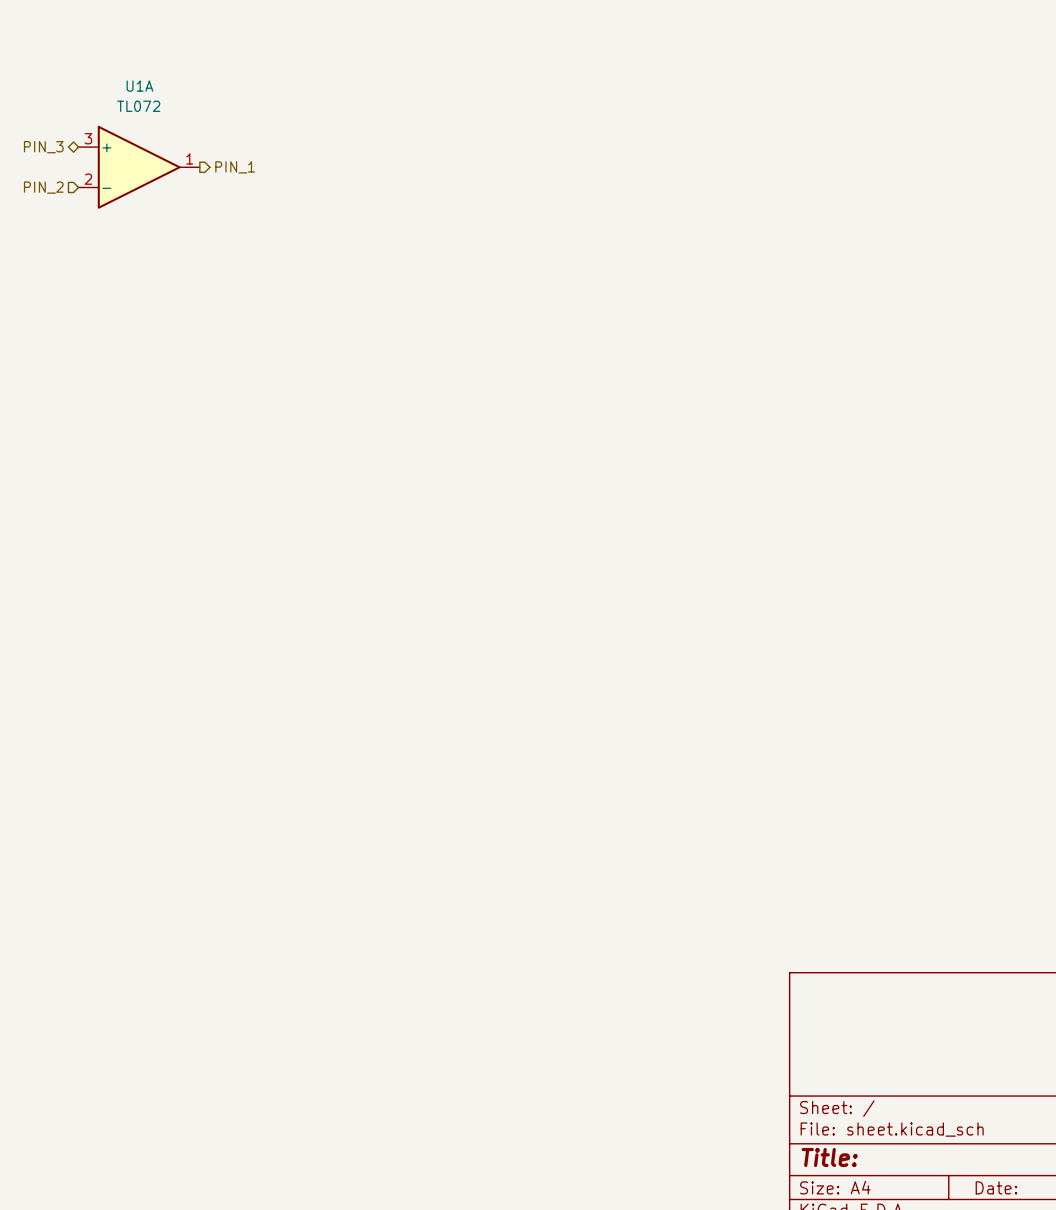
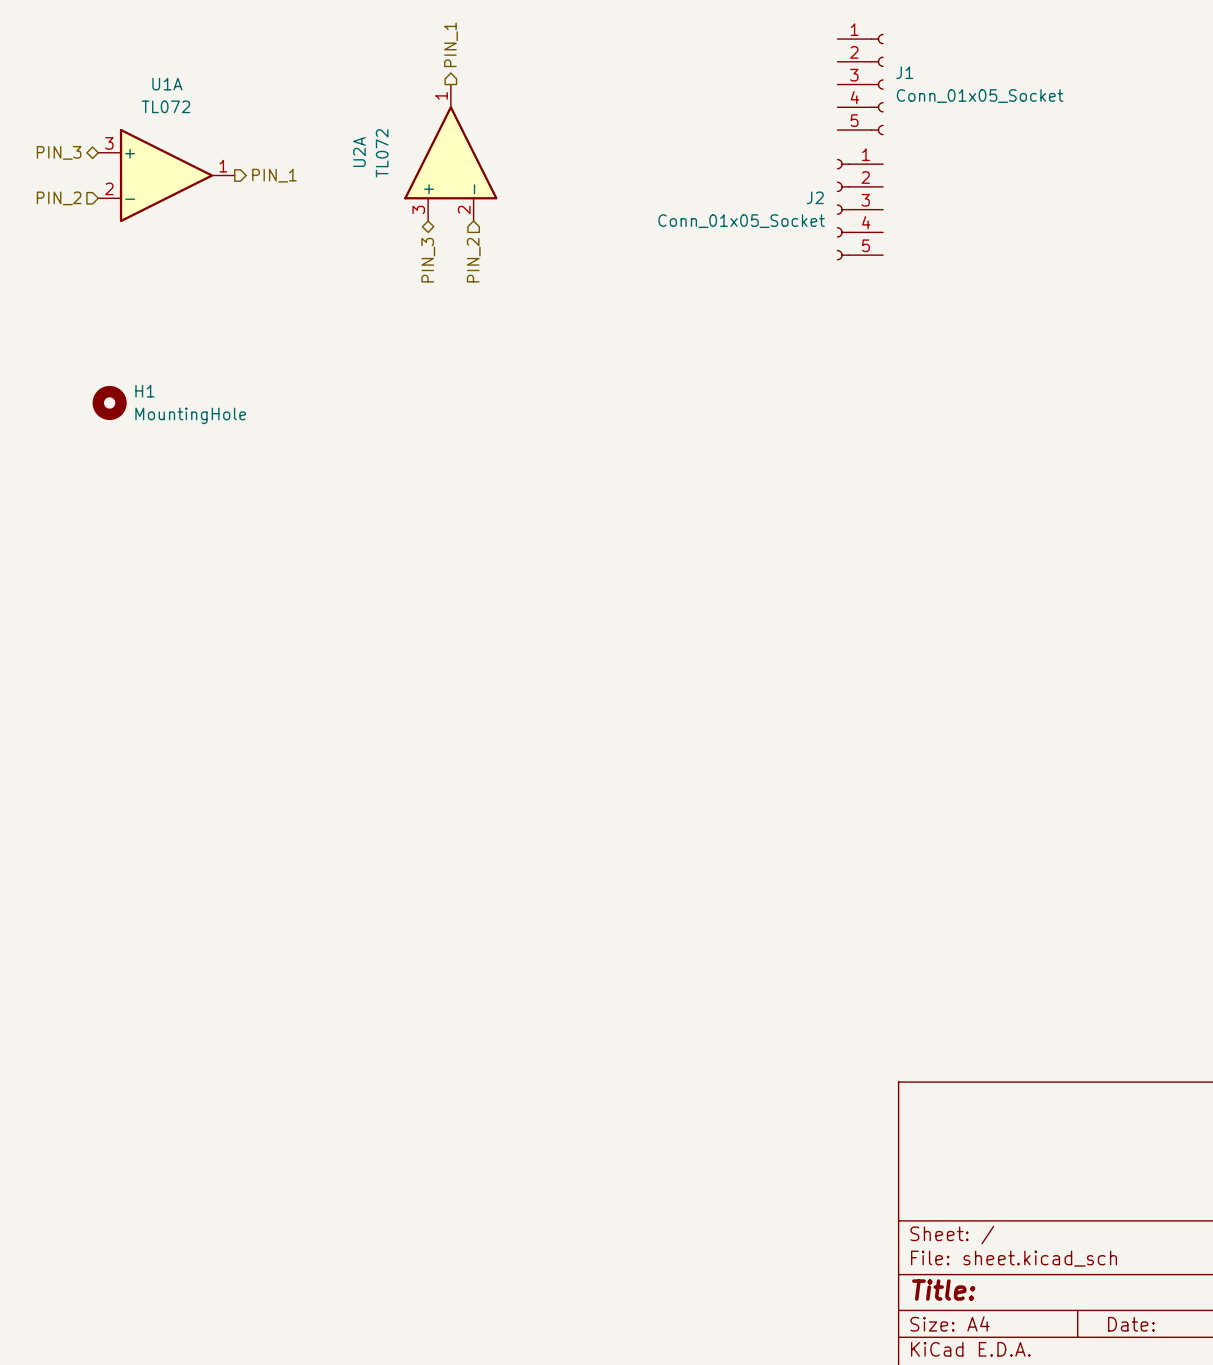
hierarchical label: none -> PIN_1 (450, 44)
J1: none -> Conn_01x05_Socket (860, 84)
U2A: none -> TL072 (450, 152)
J2: none -> Conn_01x05_Socket (859, 209)
hierarchical label: none -> PIN_3 (428, 260)
hierarchical label: none -> PIN_2 (473, 260)
H1: none -> MountingHole (109, 402)

